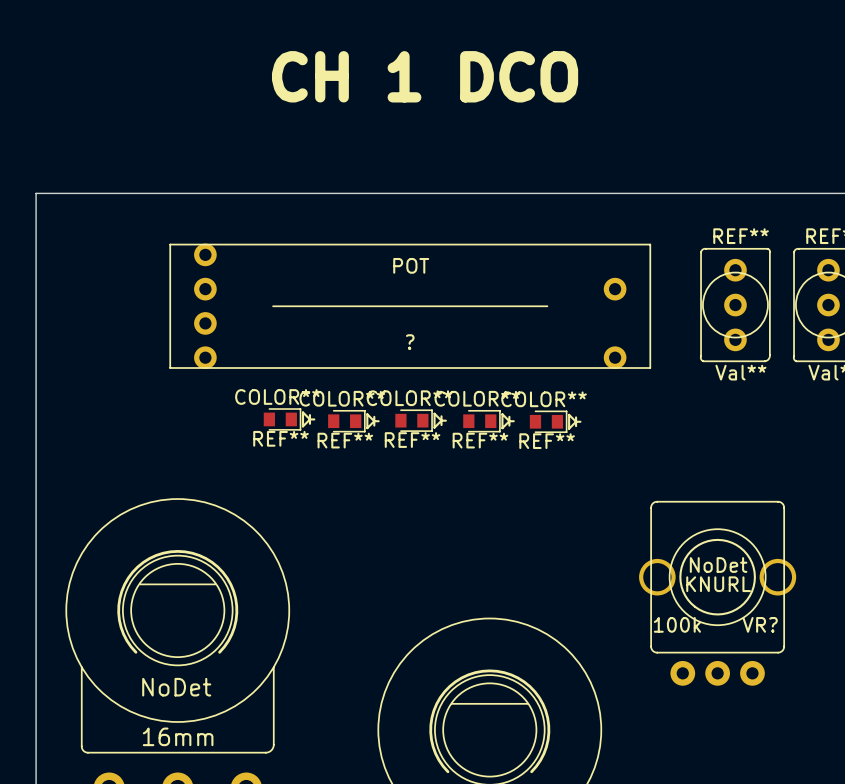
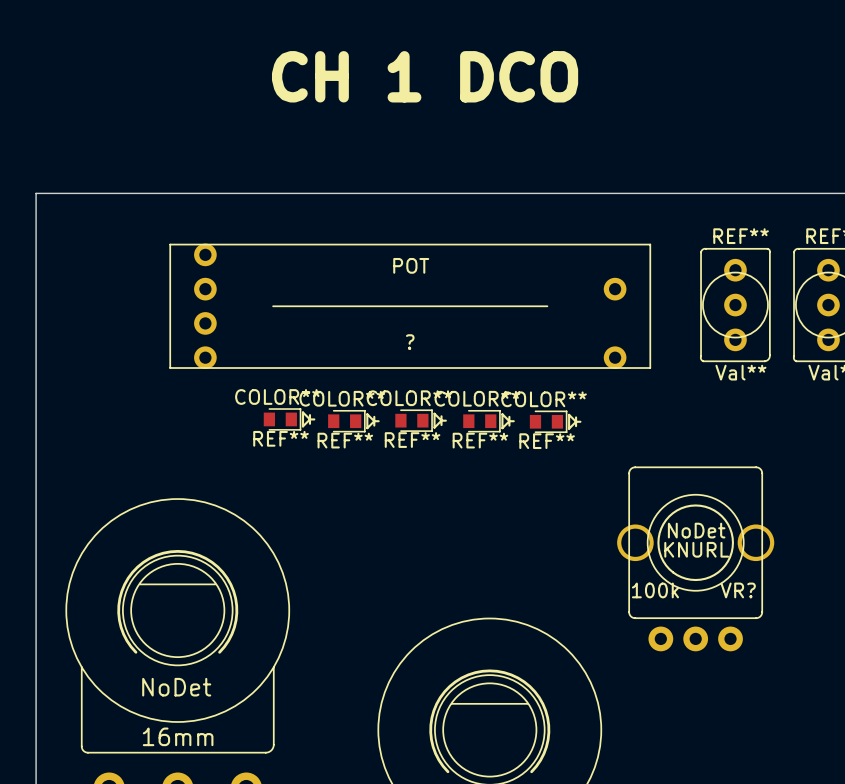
VR? position: (717, 593) -> (695, 558)

